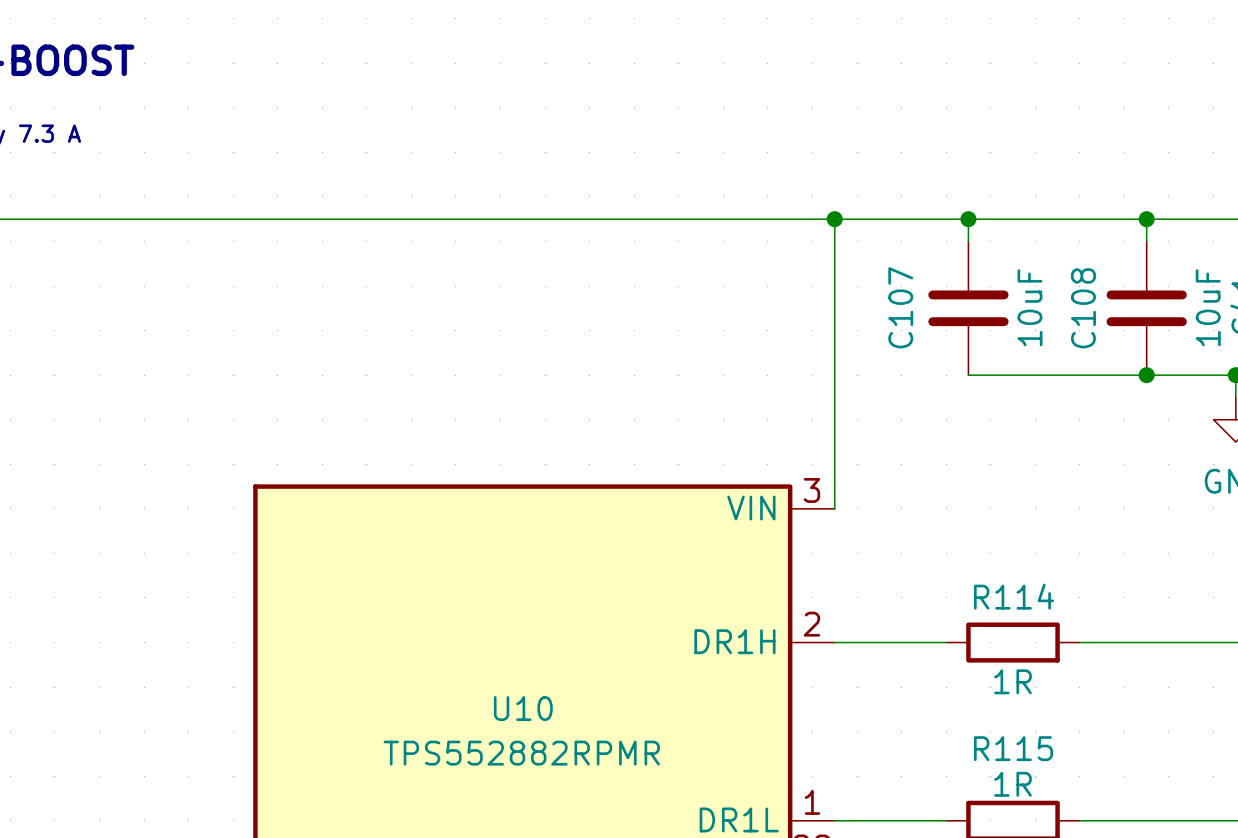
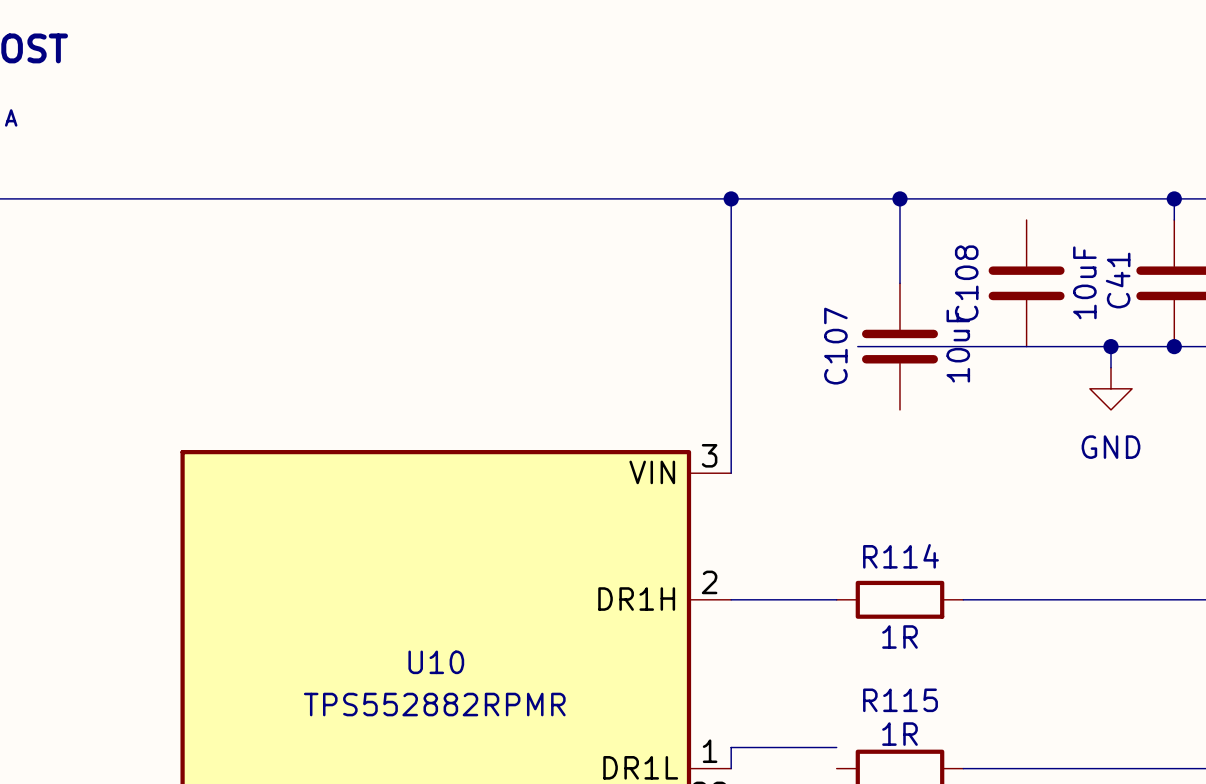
wire: (968, 219) (968, 241) -> none
junction position: (968, 219) -> (899, 198)
wire: none -> (899, 198) (899, 283)
wire: (1146, 219) (1146, 241) -> none
junction: (1146, 219) -> none
C107 position: (968, 308) -> (899, 346)
junction: (1146, 375) -> none
wire: (834, 820) (946, 820) -> (731, 768) (731, 747) (836, 747)

